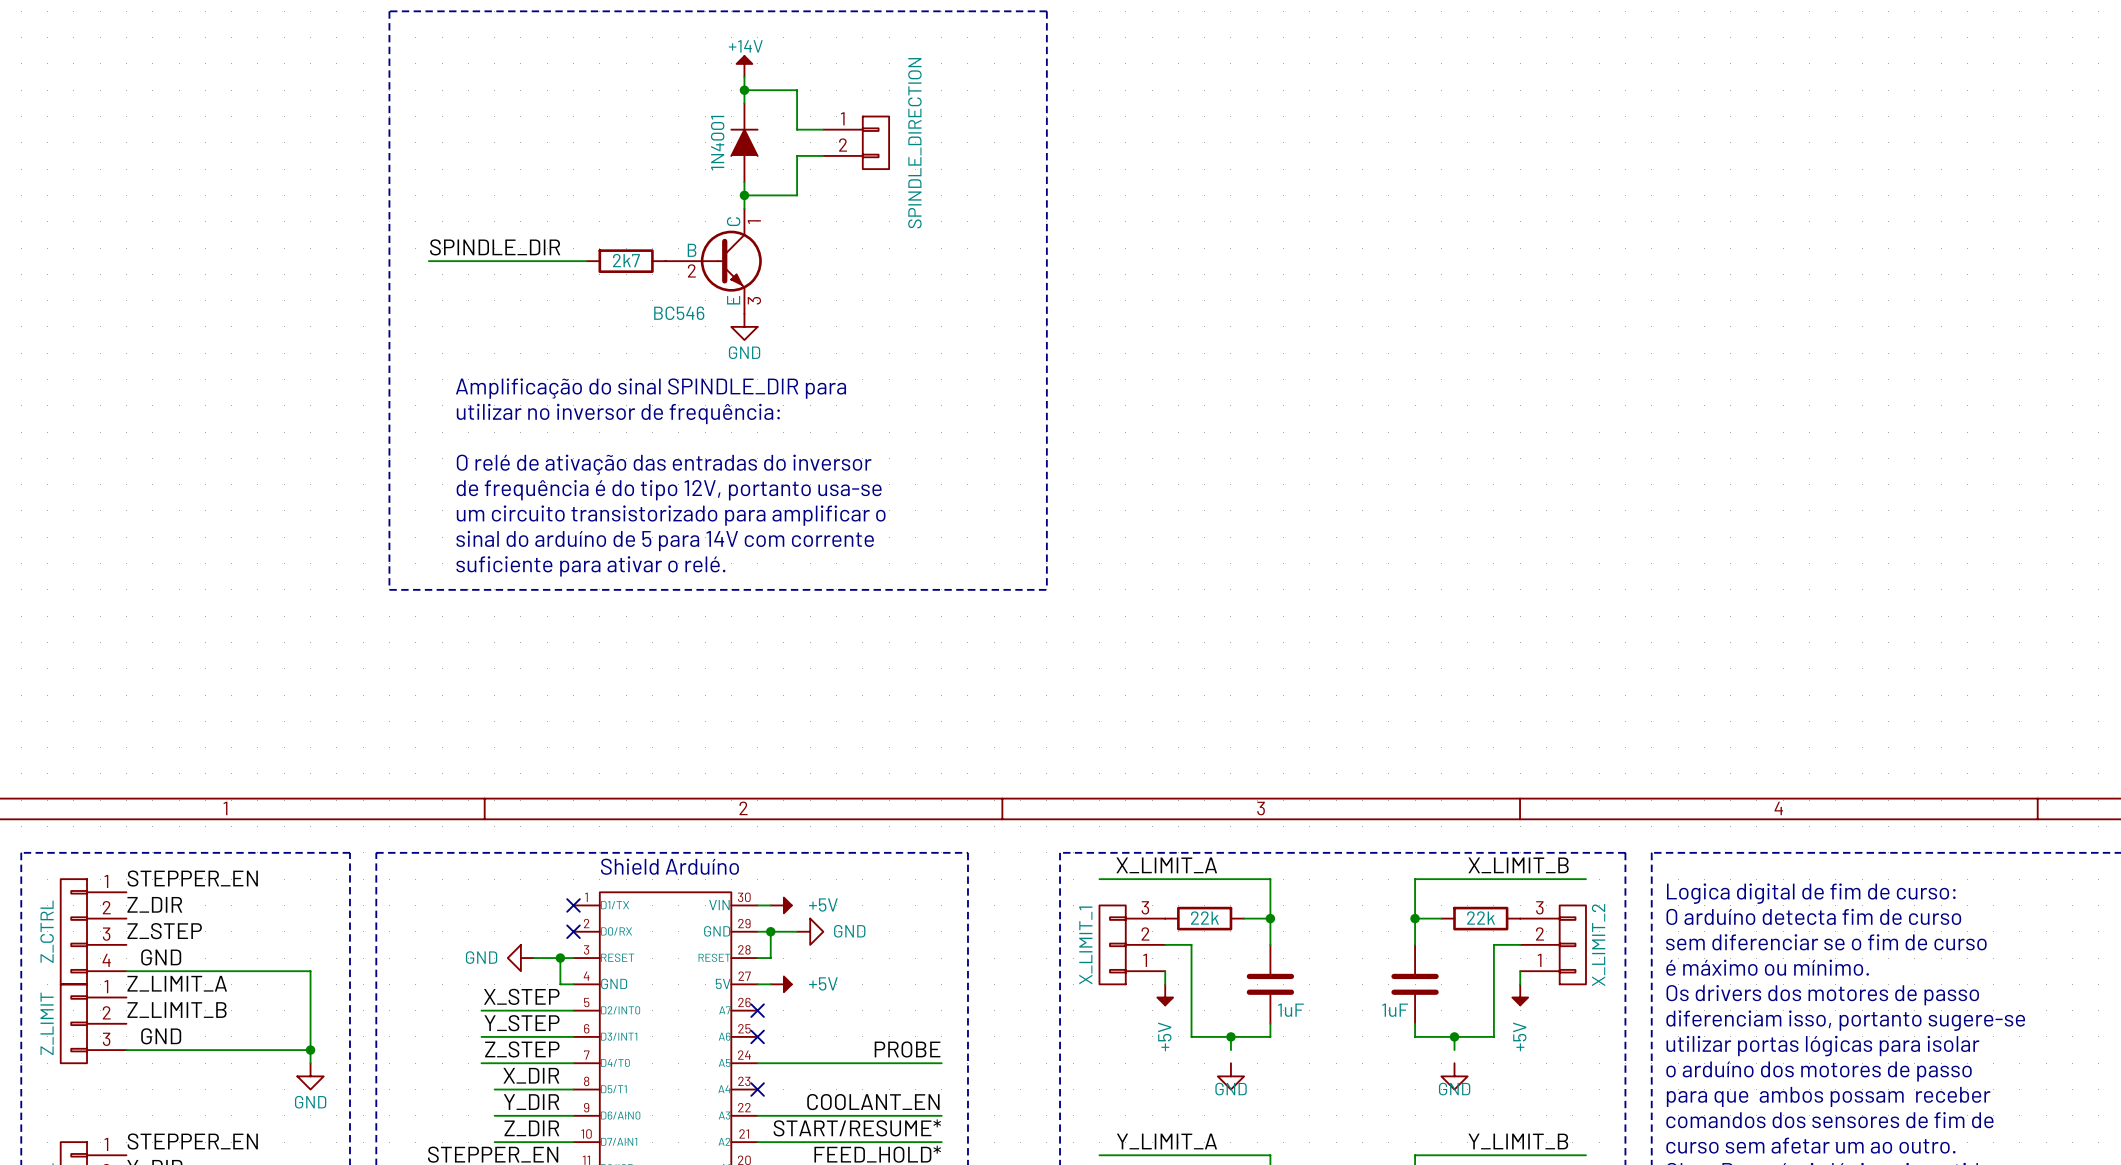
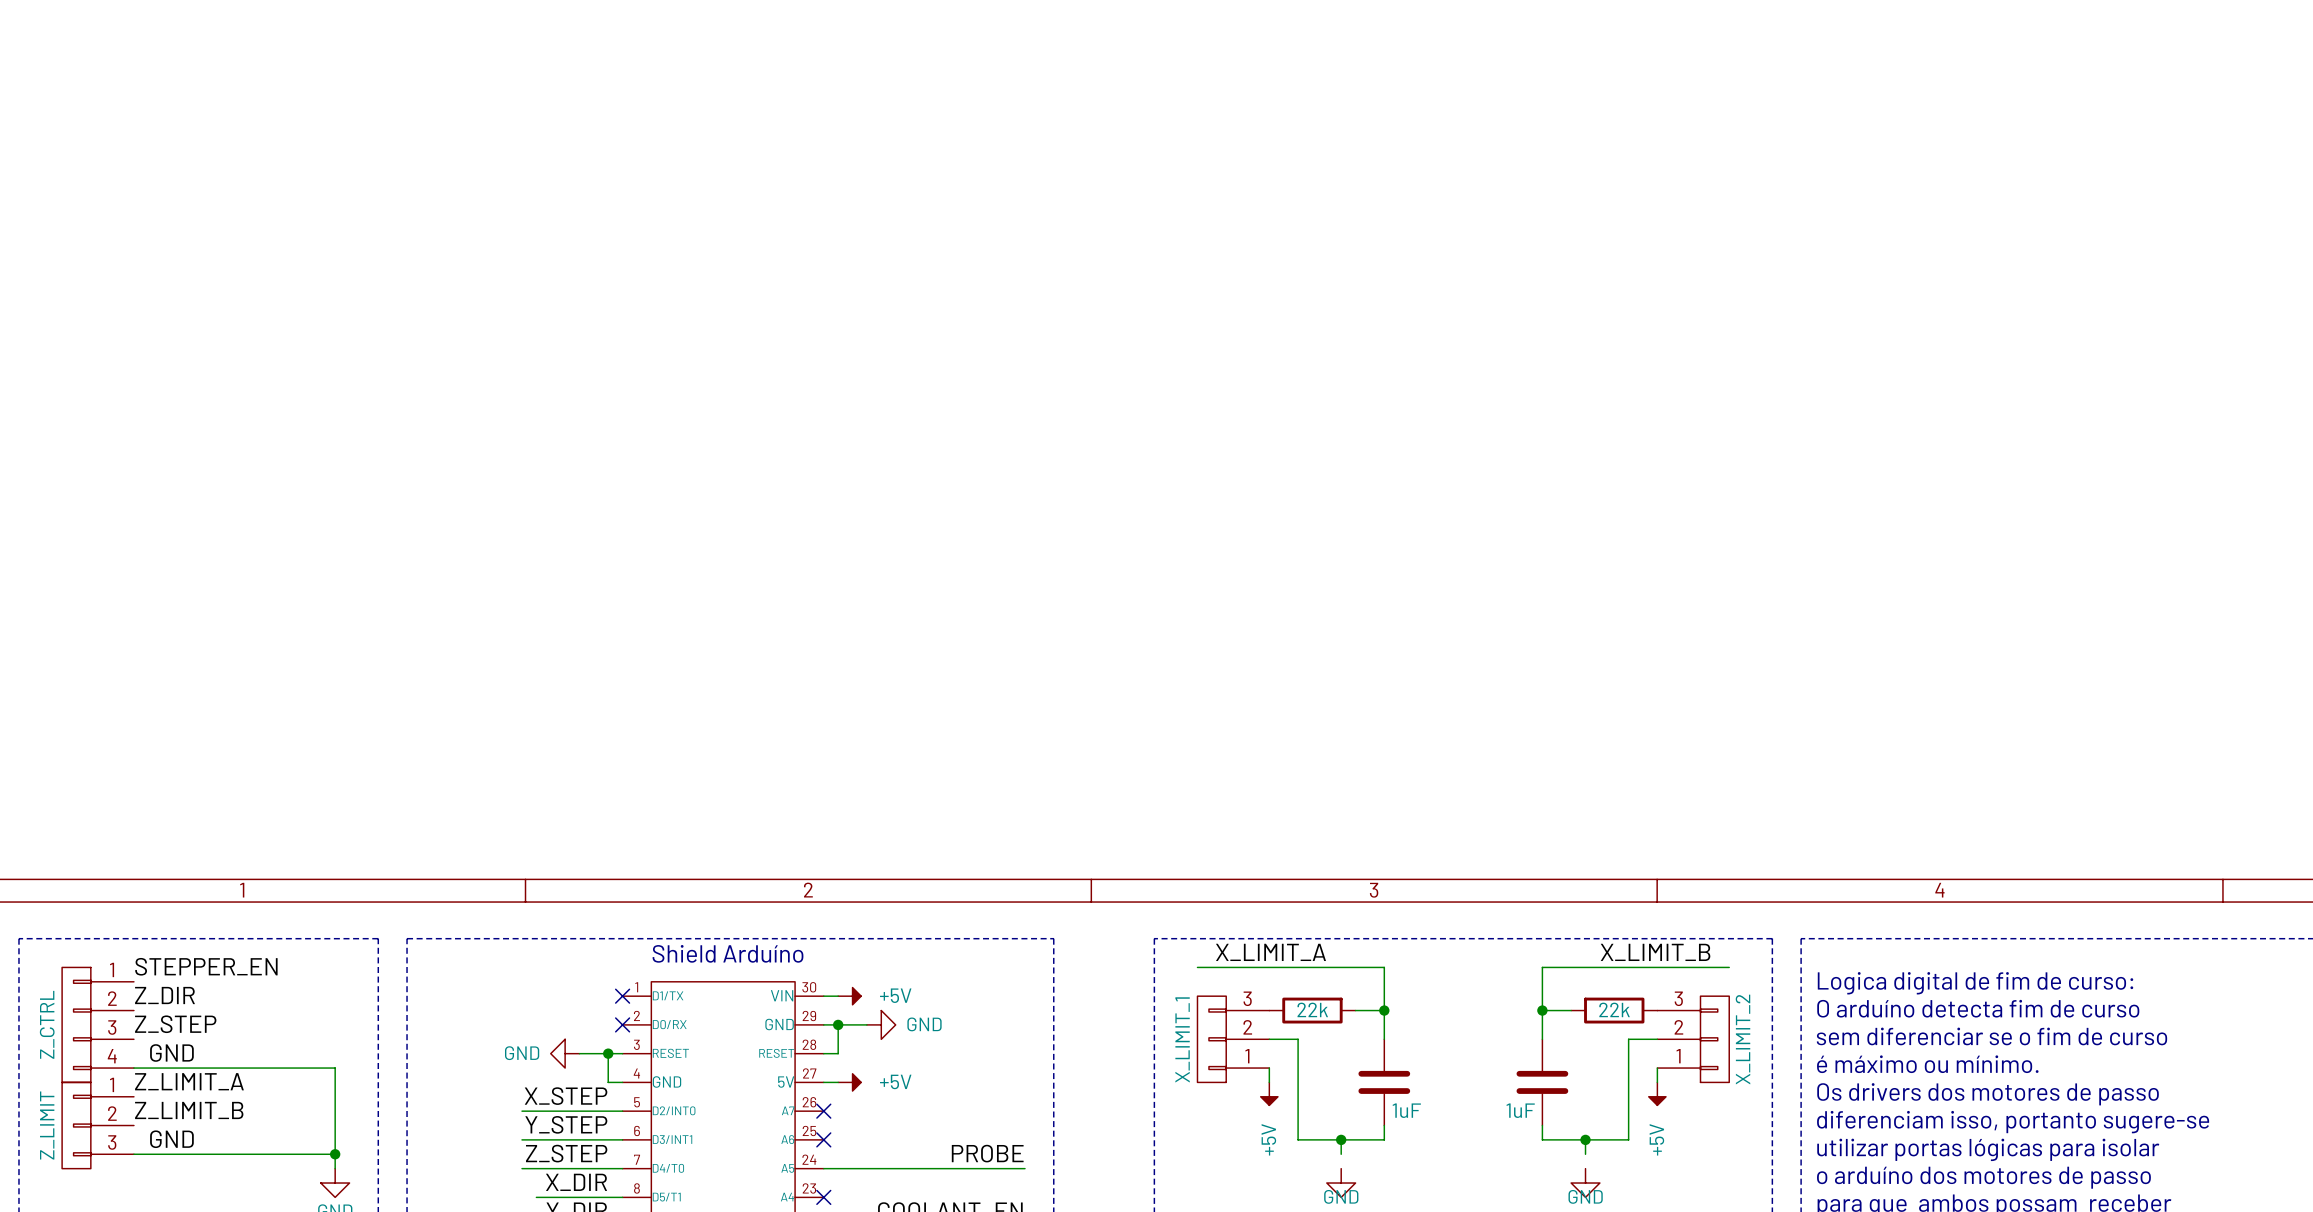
line: (389, 11) (389, 589) (1046, 589) (1046, 11) (389, 11) -> none
power symbol: +14V (744, 66) -> none
wire: (744, 77) (744, 103) -> none
wire: (744, 90) (797, 90) (797, 129) (823, 129) -> none
junction: (744, 90) -> none
part: 1N4001 (744, 142) -> none
part: SPINDLE_DIRECTION (856, 142) -> none
wire: (823, 155) (797, 155) (797, 195) (744, 195) -> none
wire: (744, 182) (744, 208) -> none
junction: (744, 195) -> none
label: SPINDLE_DIR (495, 247) -> none
wire: (428, 261) (586, 261) -> none
part: 2k7 (626, 261) -> none
part: BC546 (713, 261) -> none
power symbol: GND (744, 326) -> none
text: Amplificação do sinal SPINDLE_DIR para (650, 388) -> none
text: utilizar no inversor de frequência: (618, 413) -> none
text: O relé de ativação das entradas do inversor (664, 464) -> none
text: de frequência é do tipo 12V, portanto usa-se (669, 490) -> none
text: um circuito transistorizado para amplificar o (671, 515) -> none
text: sinal do arduíno de 5 para 14V com corrente (665, 540) -> none
text: suficiente para ativar o relé. (590, 566) -> none

